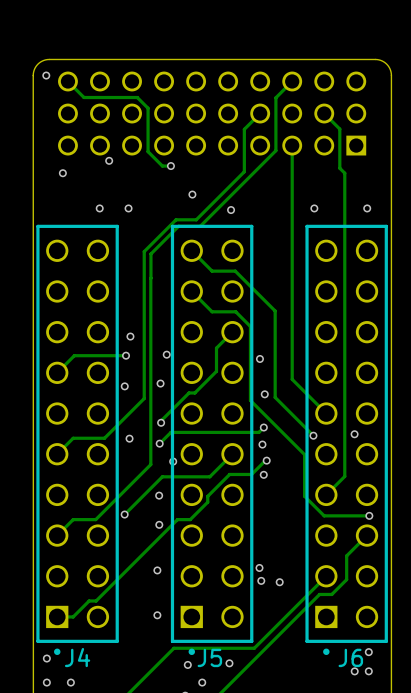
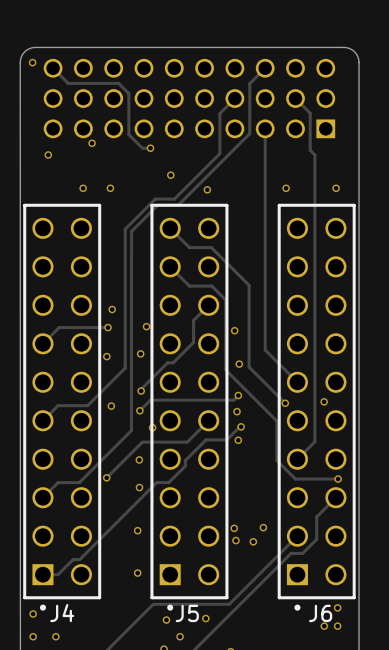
via: none -> (263, 527)

